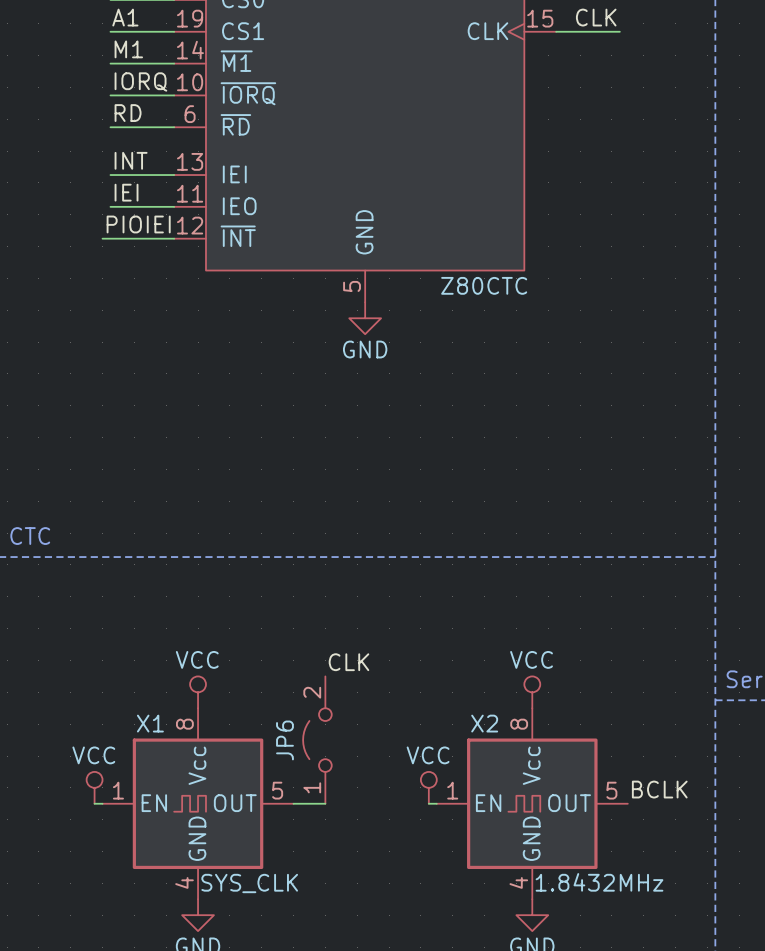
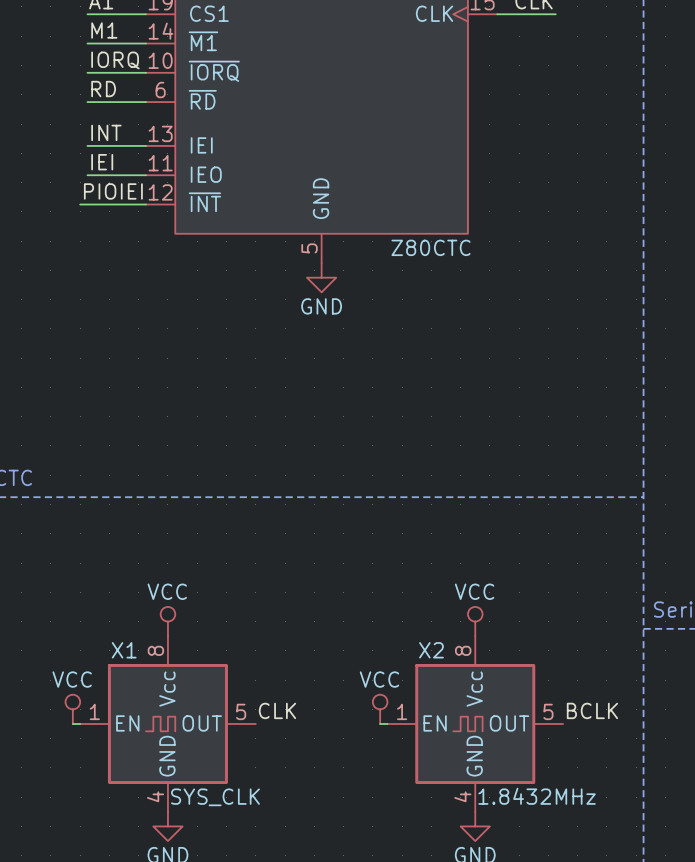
label position: CLK (348, 662) -> CLK (277, 710)
JP6: (317, 740) -> none
wire: (293, 803) (325, 803) -> none

